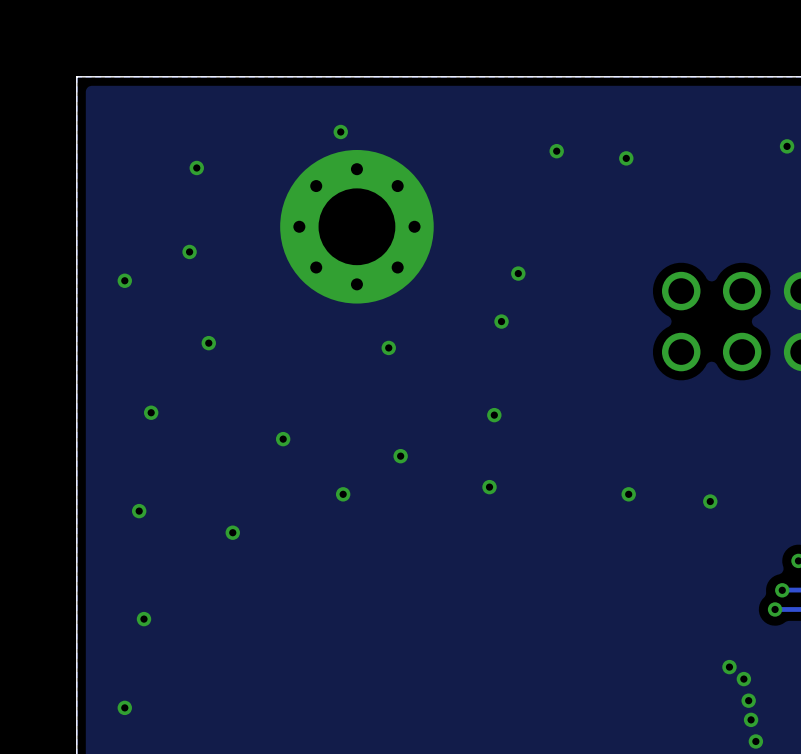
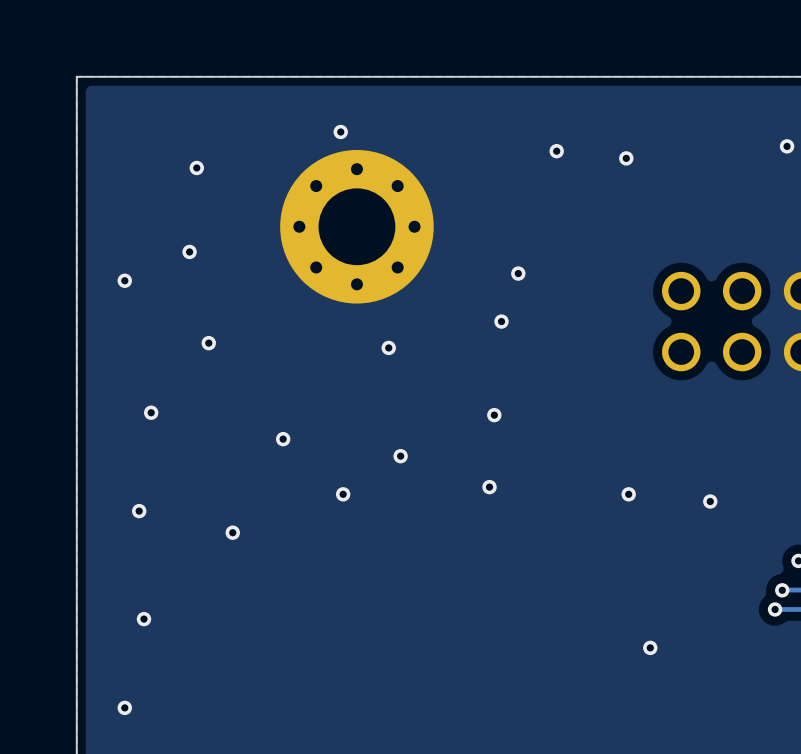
via: none -> (650, 647)
via: (729, 667) -> none
via: (743, 679) -> none
via: (748, 700) -> none
via: (751, 719) -> none
via: (755, 741) -> none

